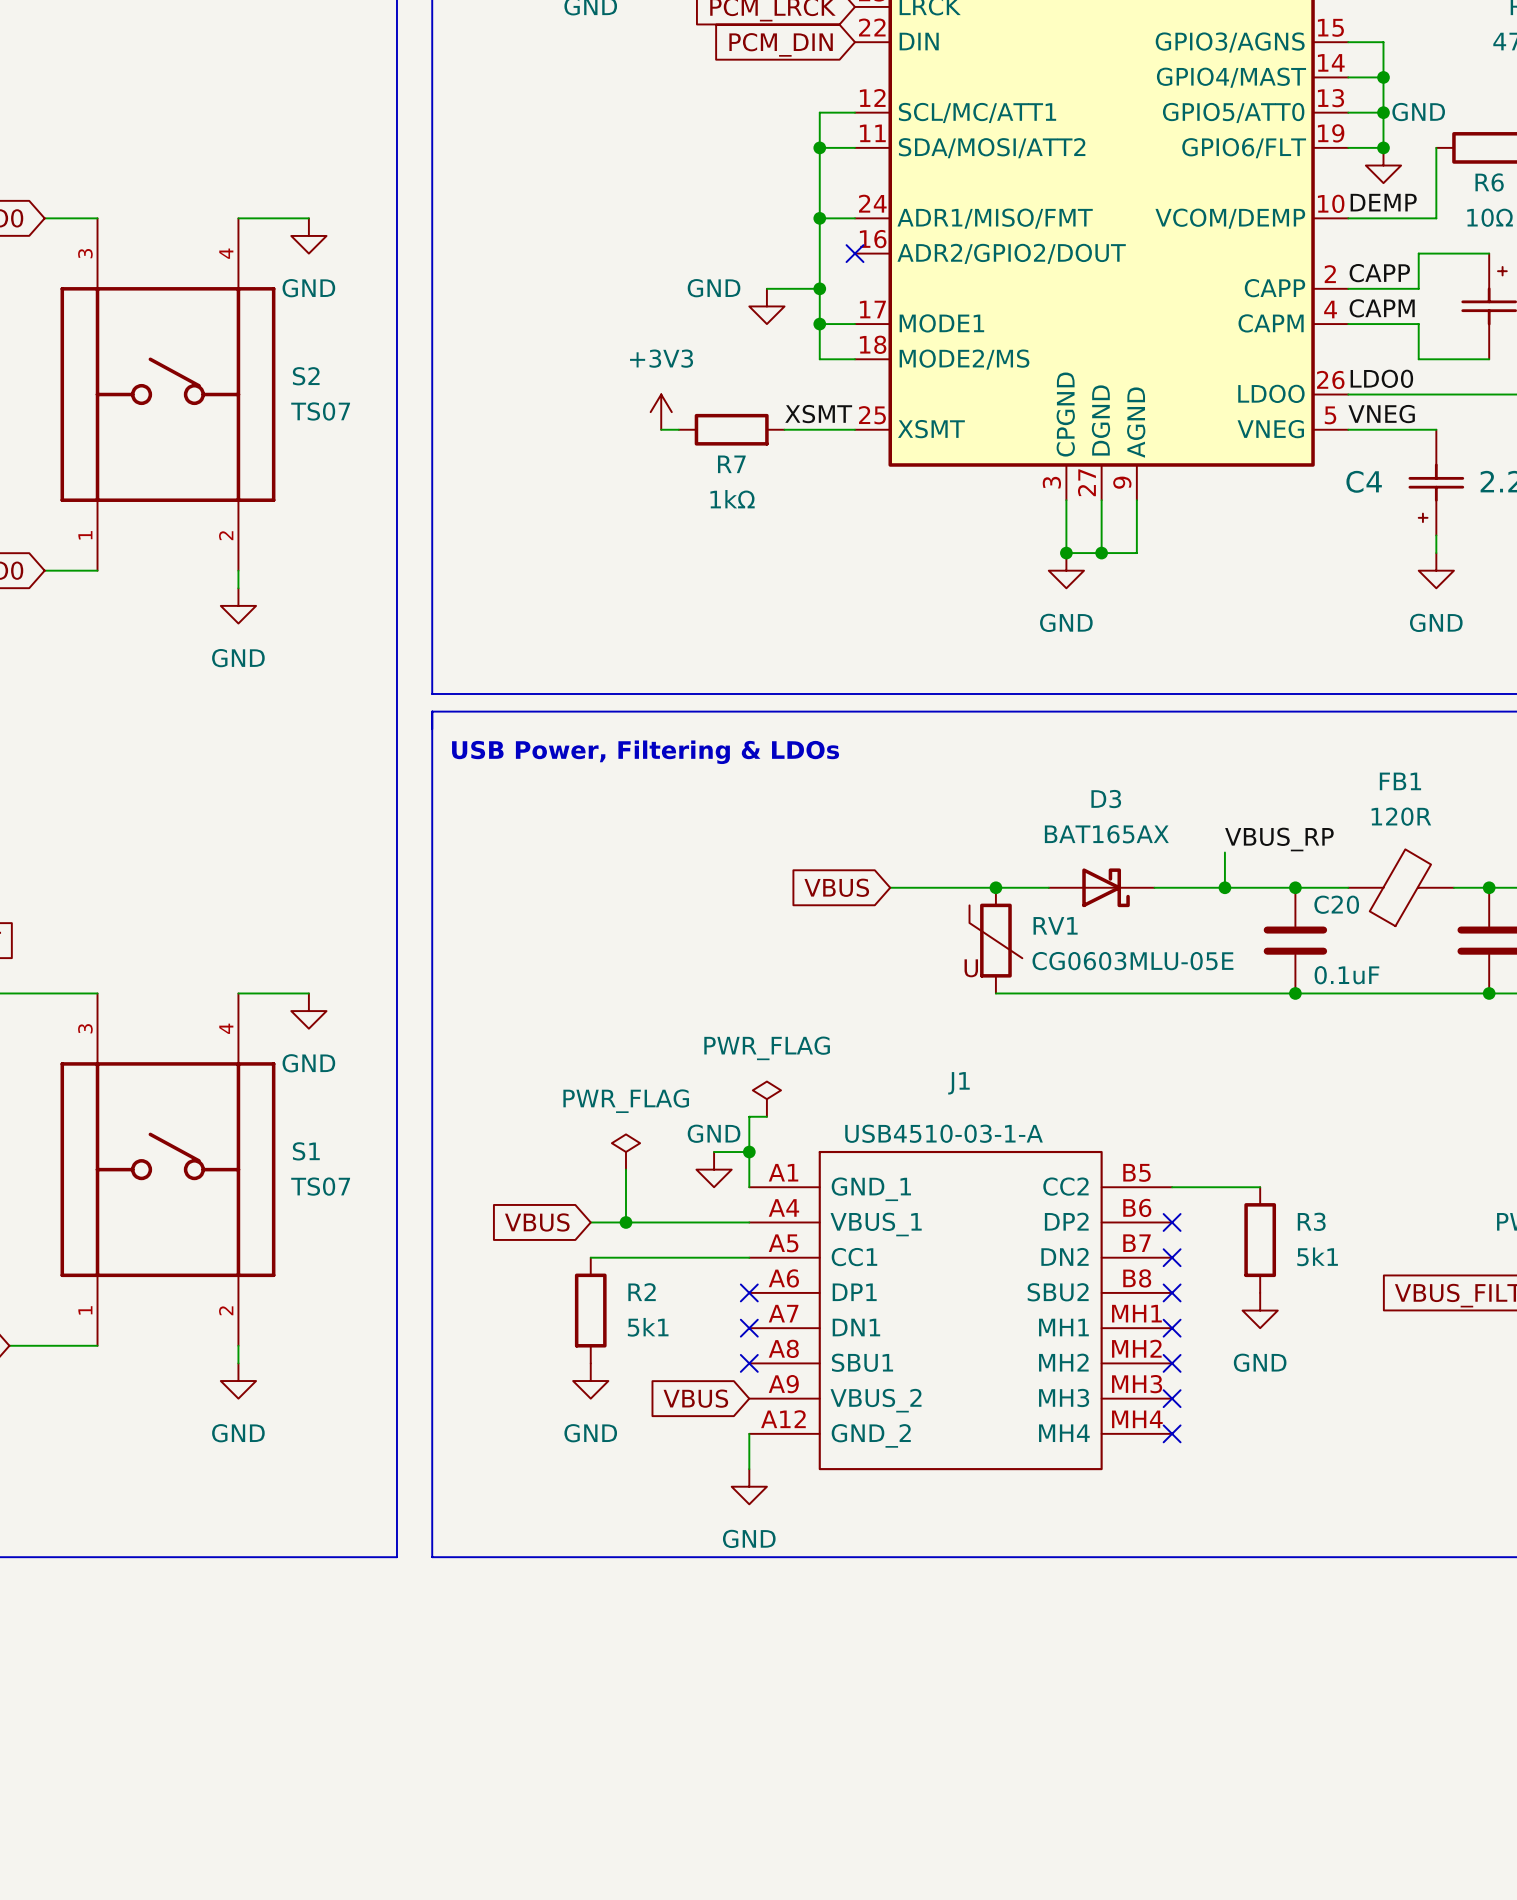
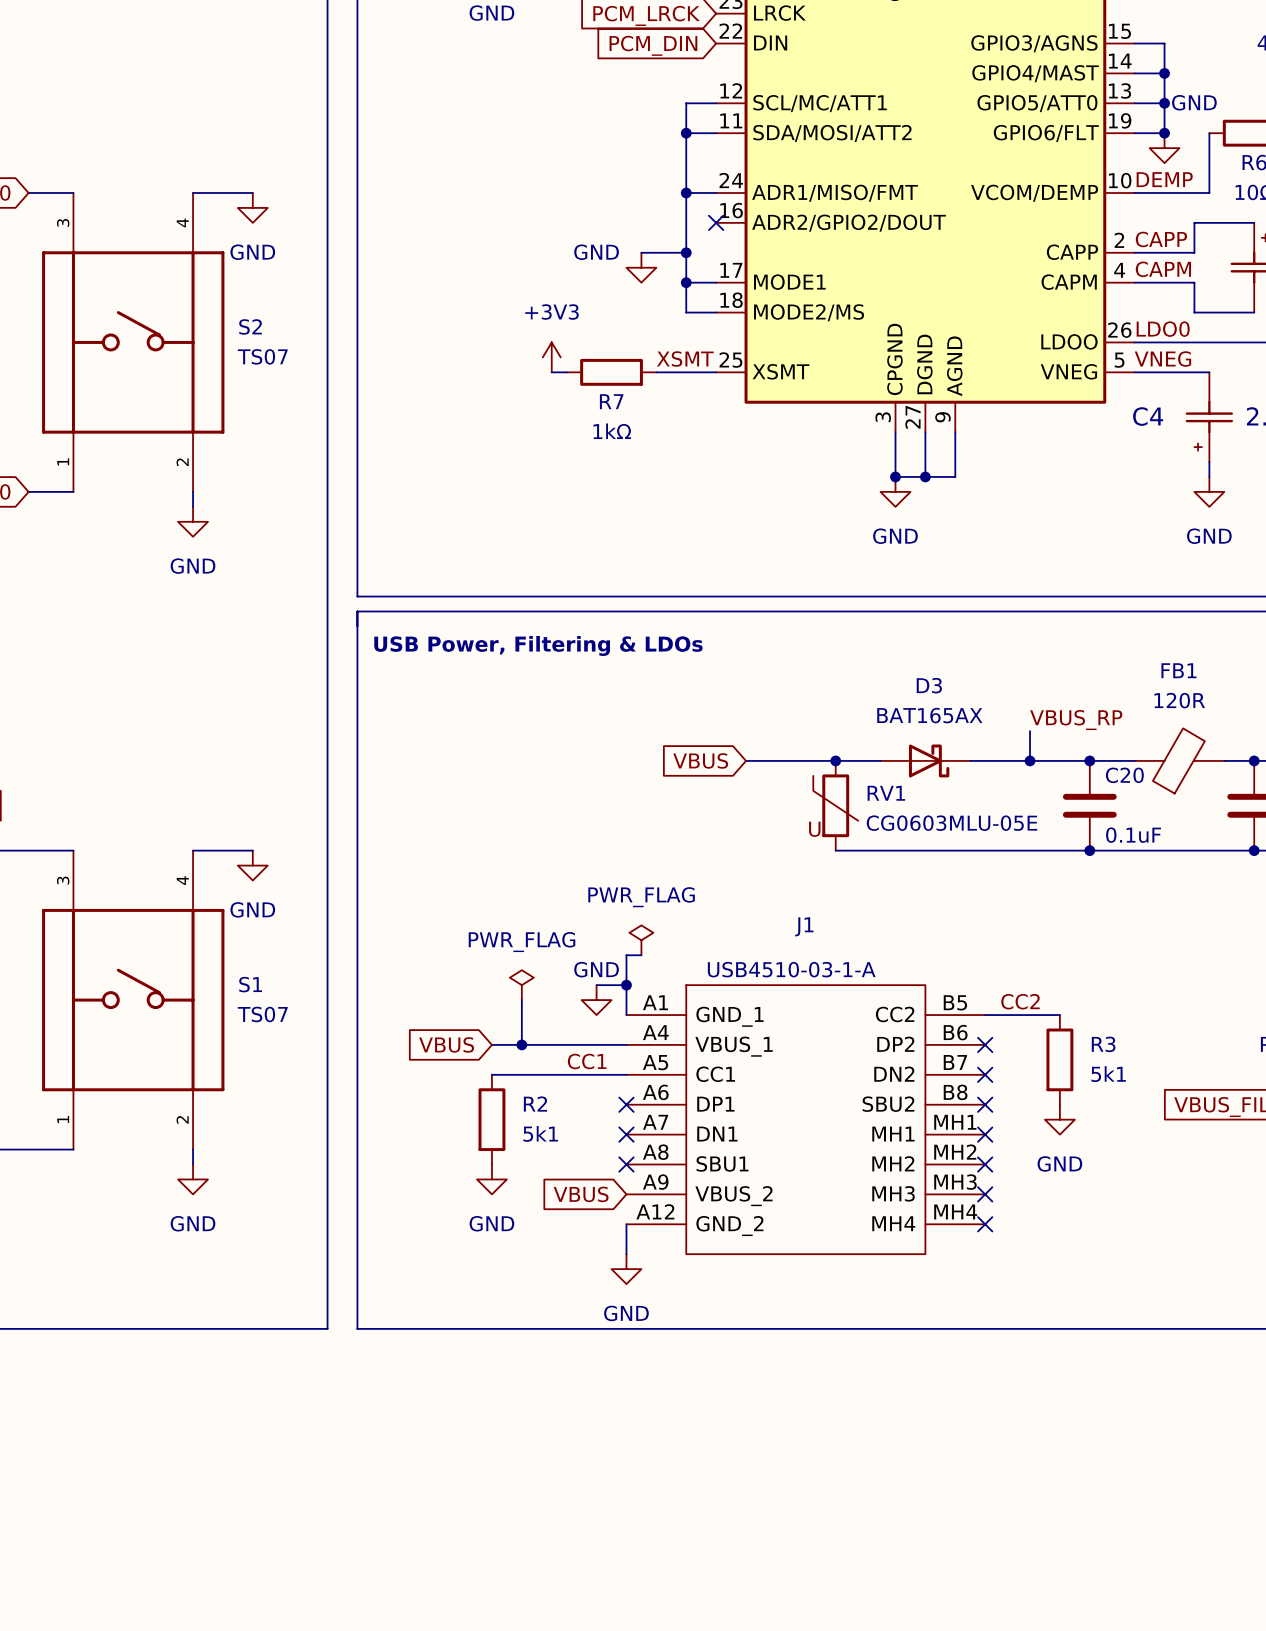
label: none -> CC2 (1020, 1001)
label: none -> CC1 (587, 1061)

